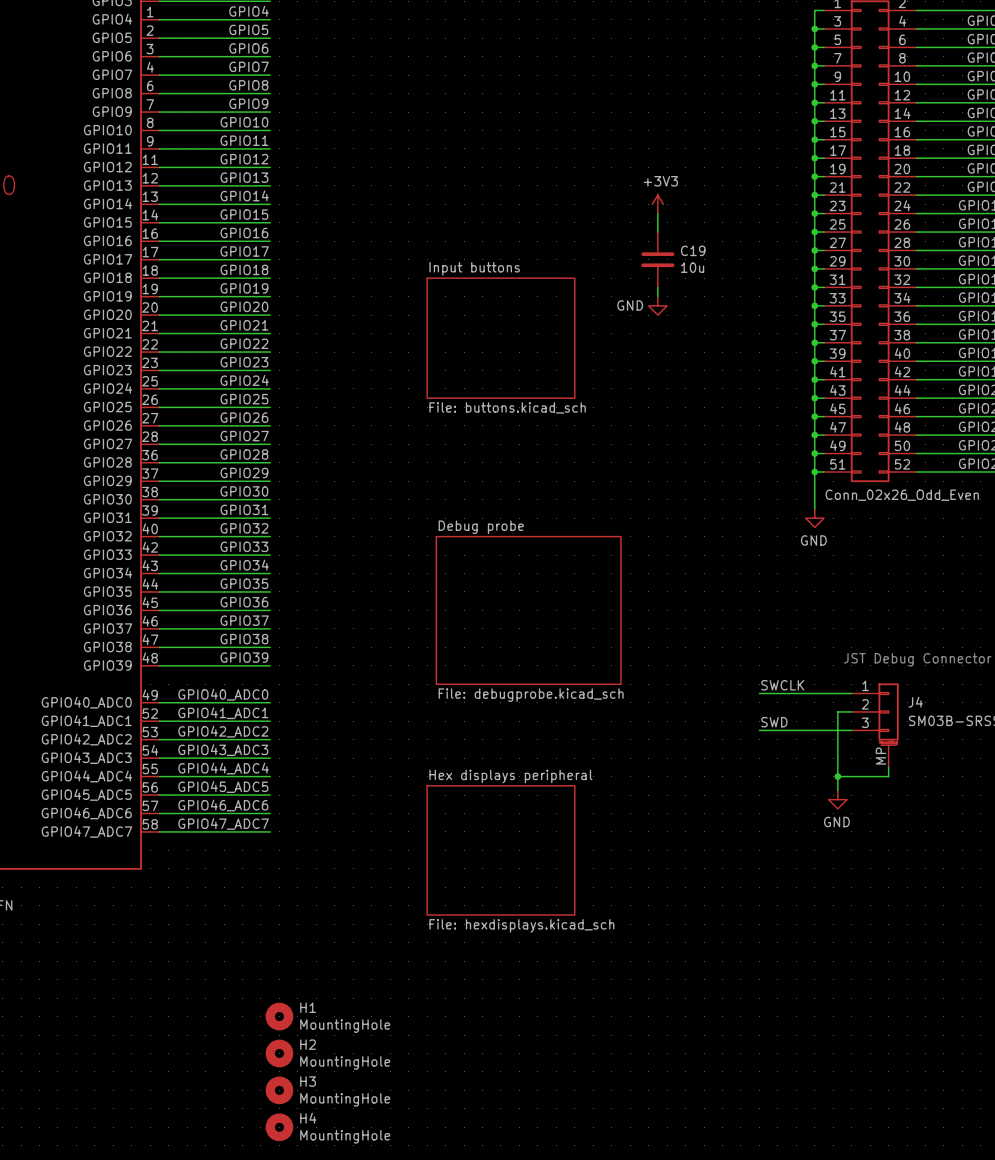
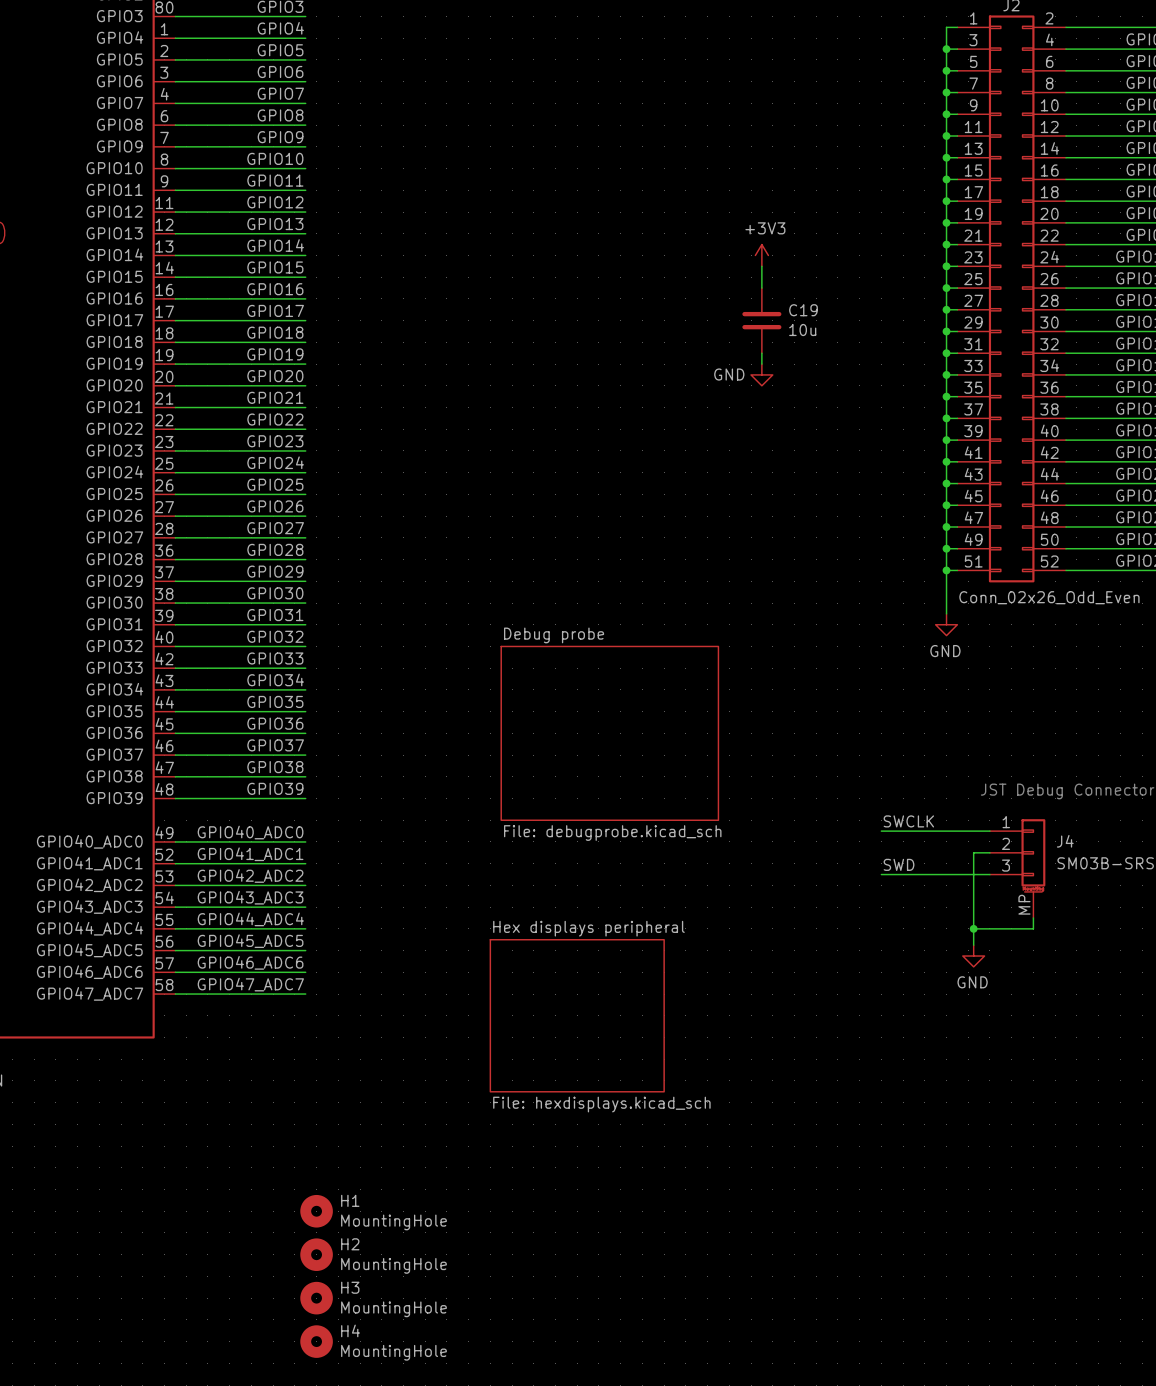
sheet Input buttons: File: buttons.kicad_sch (500, 338) -> none

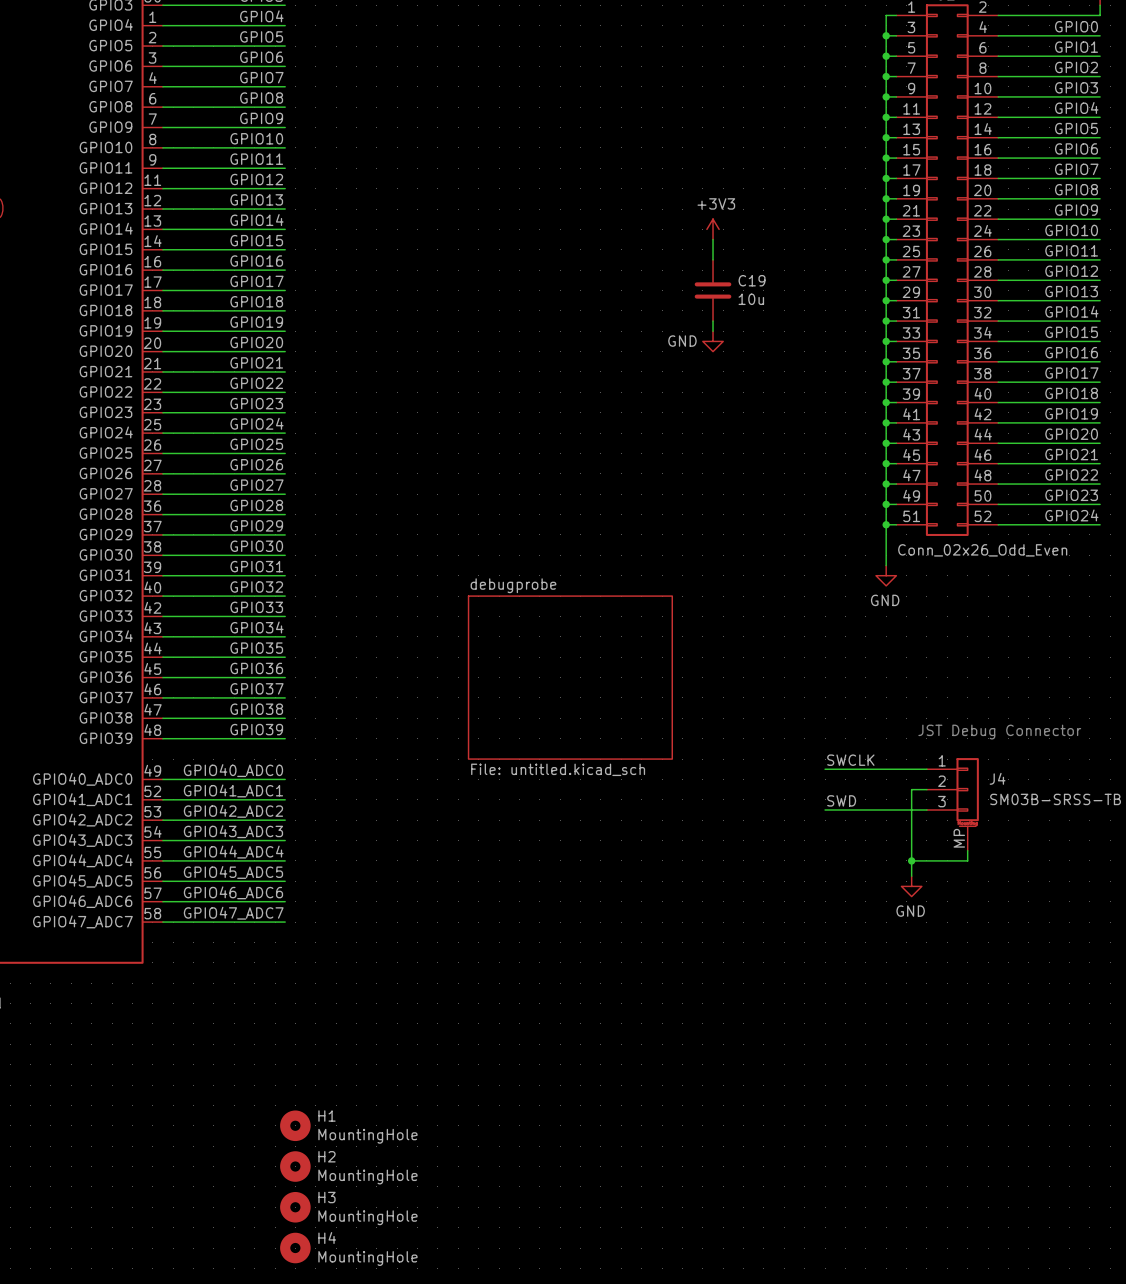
sheet Debug probe name: Debug probe (554, 635) -> debugprobe (513, 585)
sheet Debug probe value: File: debugprobe.kicad_sch (612, 833) -> File: untitled.kicad_sch (558, 769)
sheet Hex displays peripheral: File: hexdisplays.kicad_sch (577, 1015) -> none

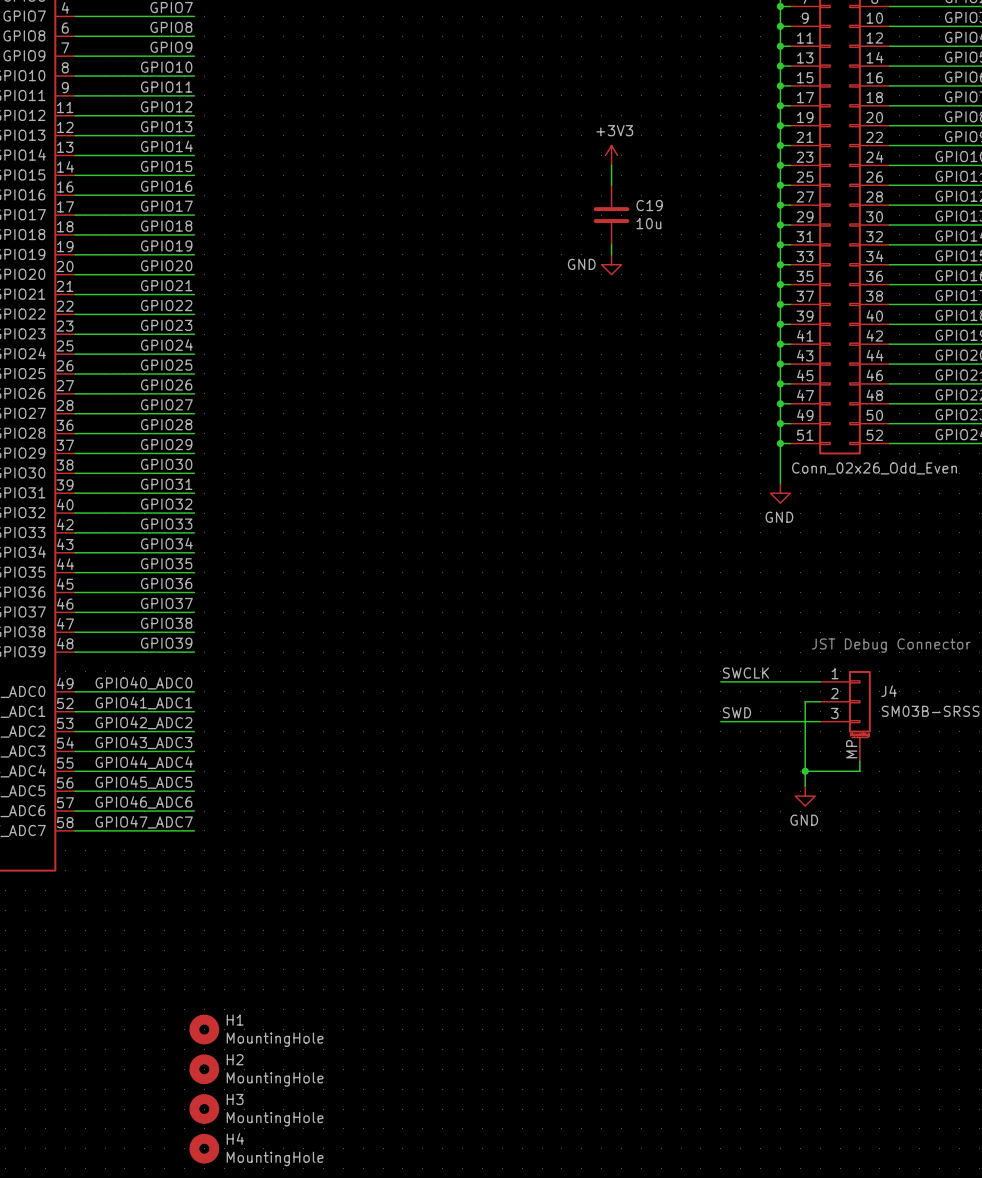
sheet debugprobe: File: untitled.kicad_sch (570, 677) -> none

